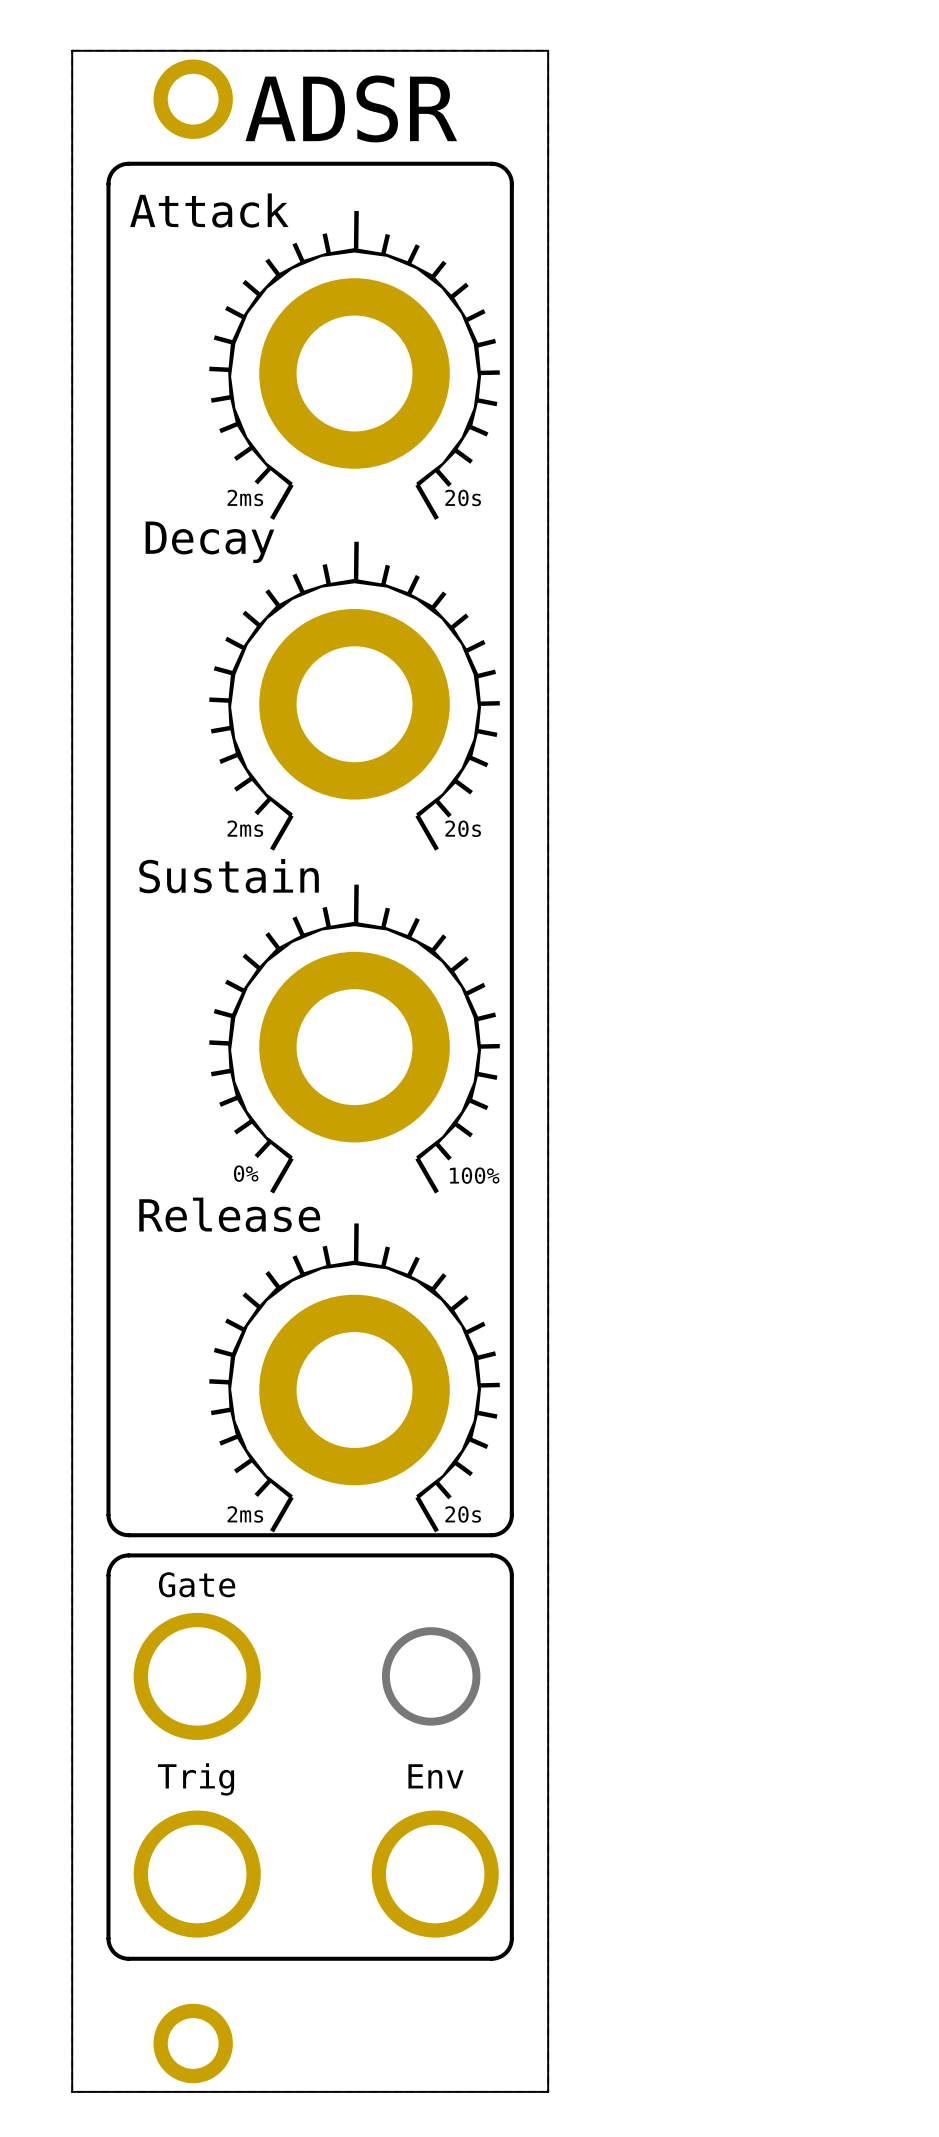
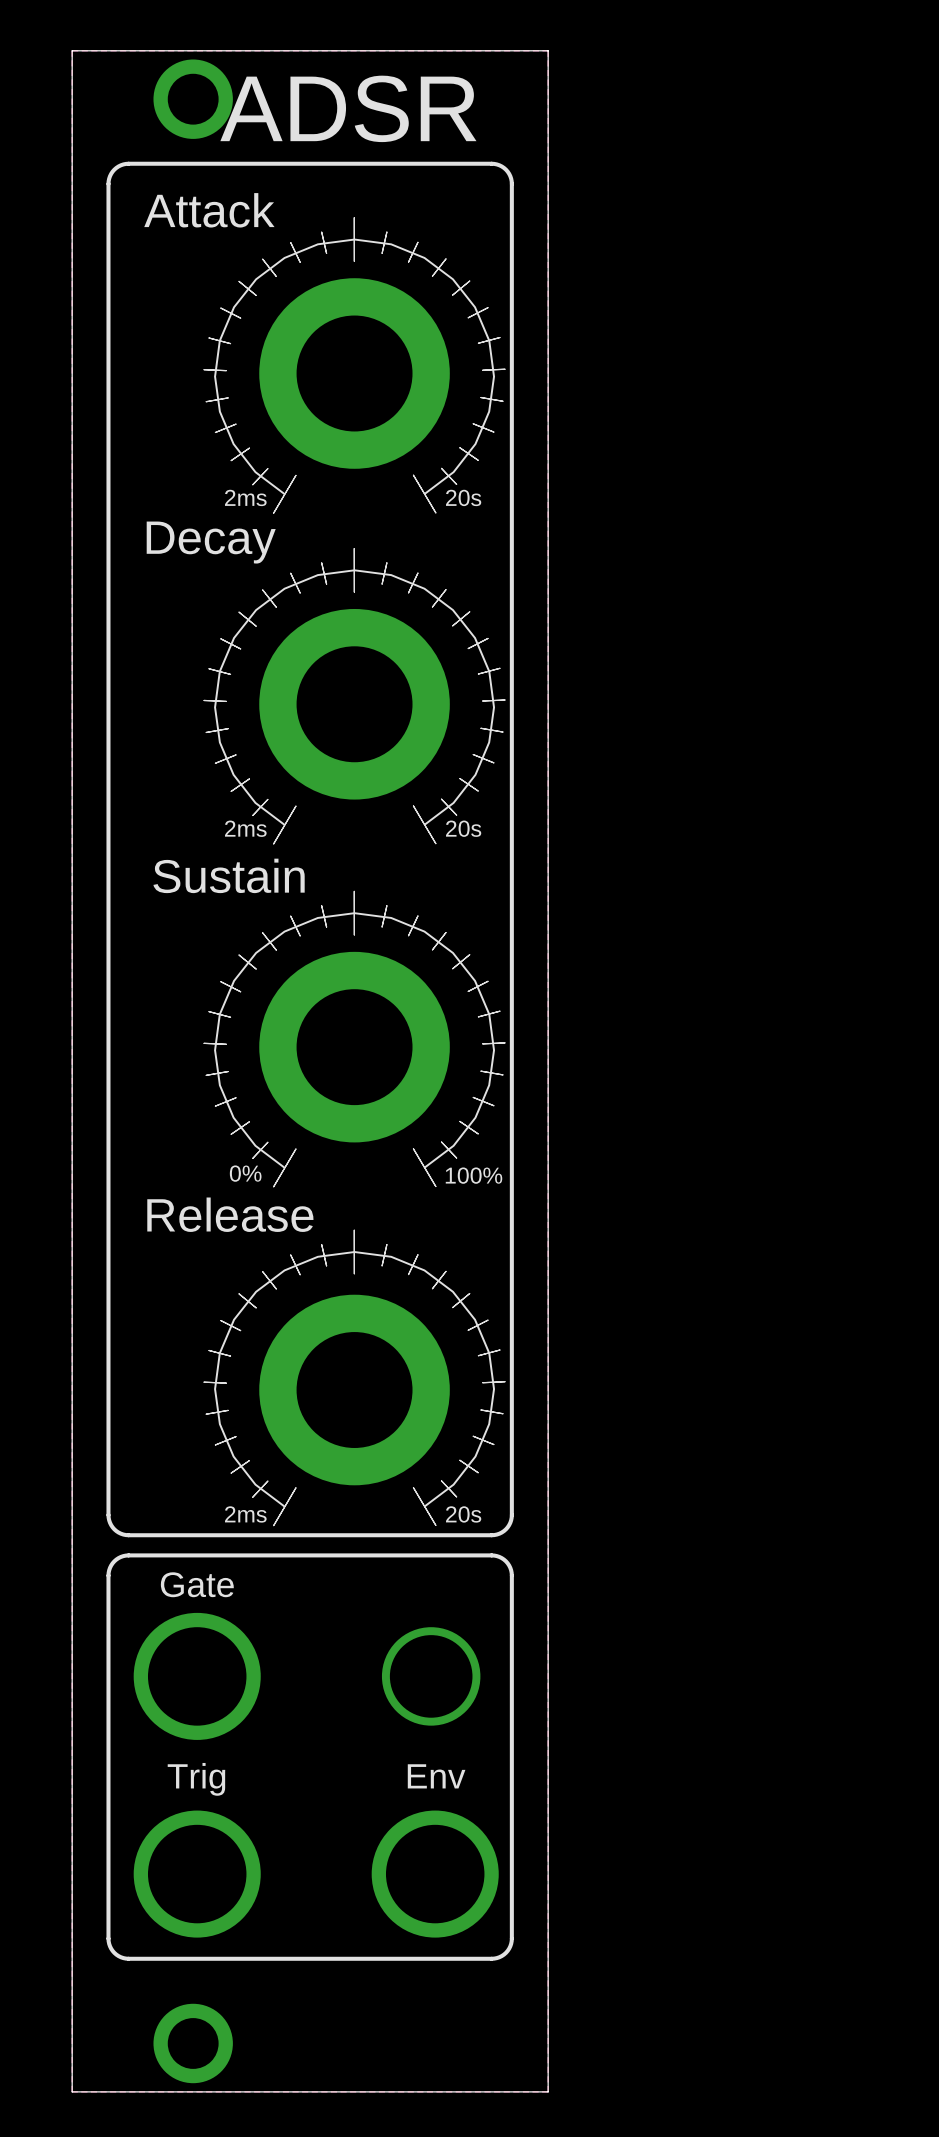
drawing shape: [209, 210, 500, 520] -> [203, 217, 506, 514]
drawing shape: [209, 541, 500, 851] -> [203, 548, 506, 845]
drawing shape: [209, 884, 500, 1194] -> [203, 891, 506, 1188]
drawing shape: [209, 1223, 500, 1533] -> [203, 1229, 506, 1526]

